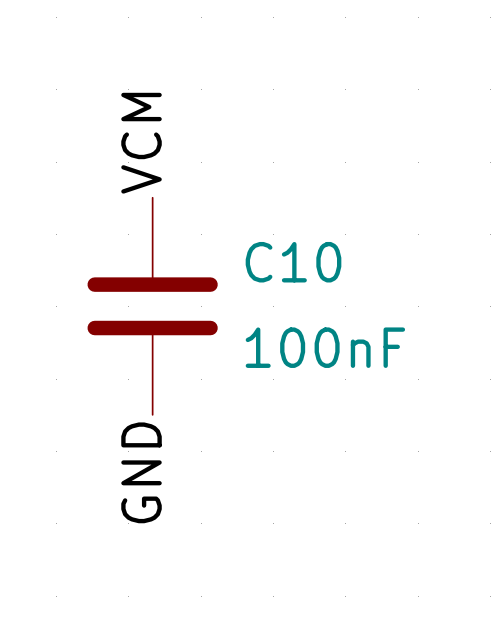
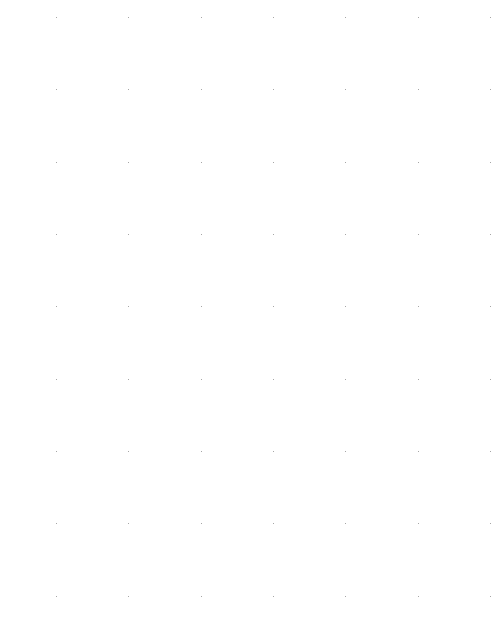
label: VCM (141, 143) -> none
C10: 100nF (152, 306) -> none
label: GND (141, 472) -> none

